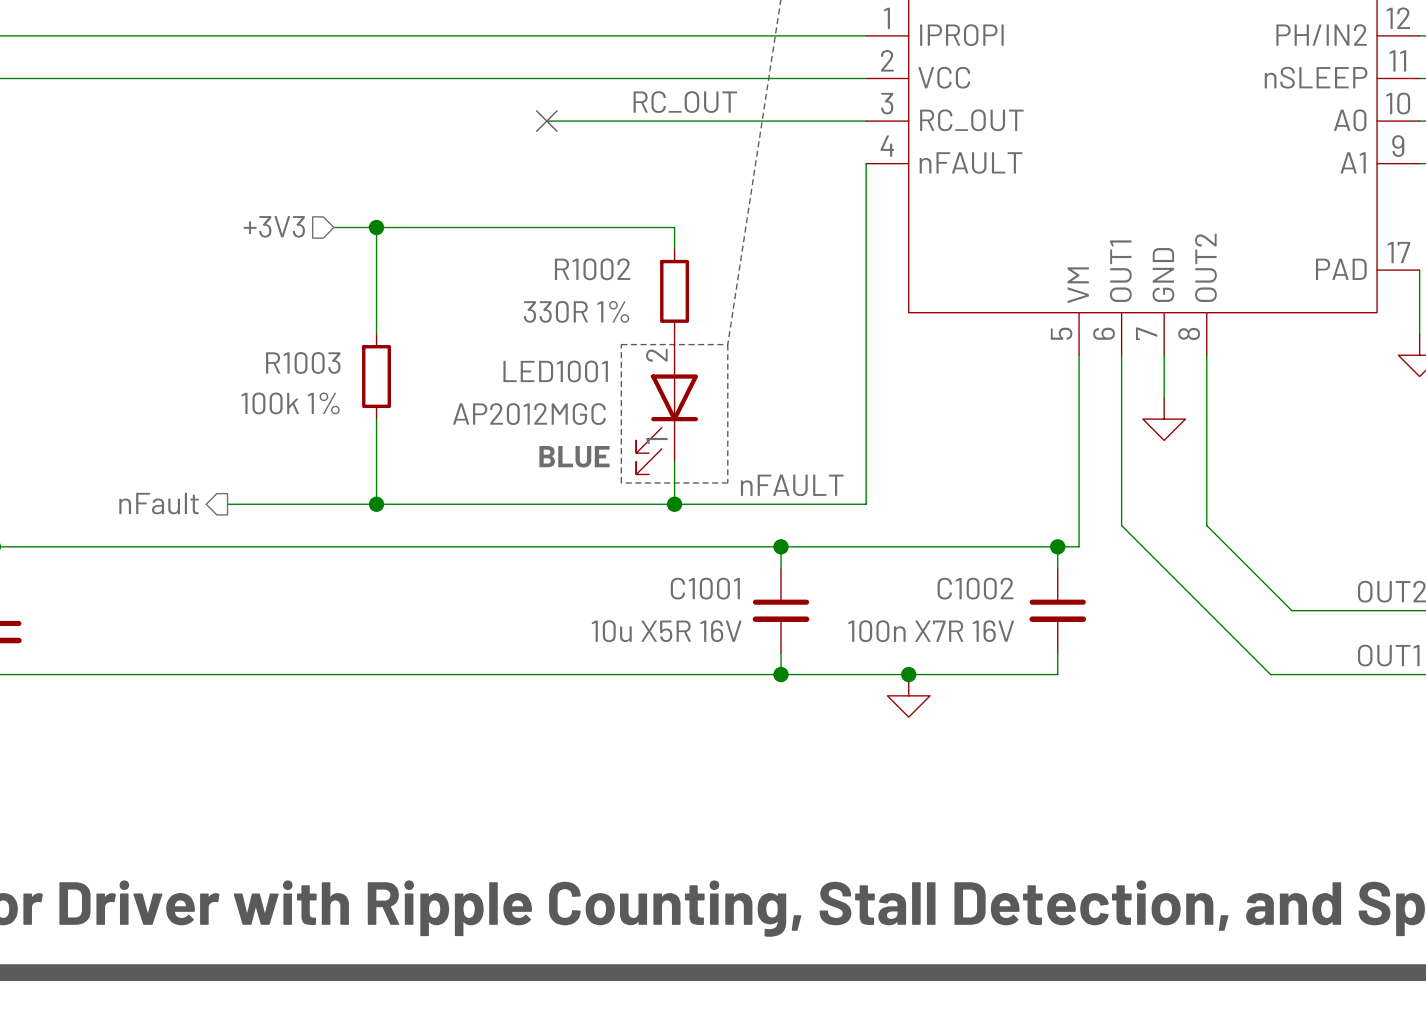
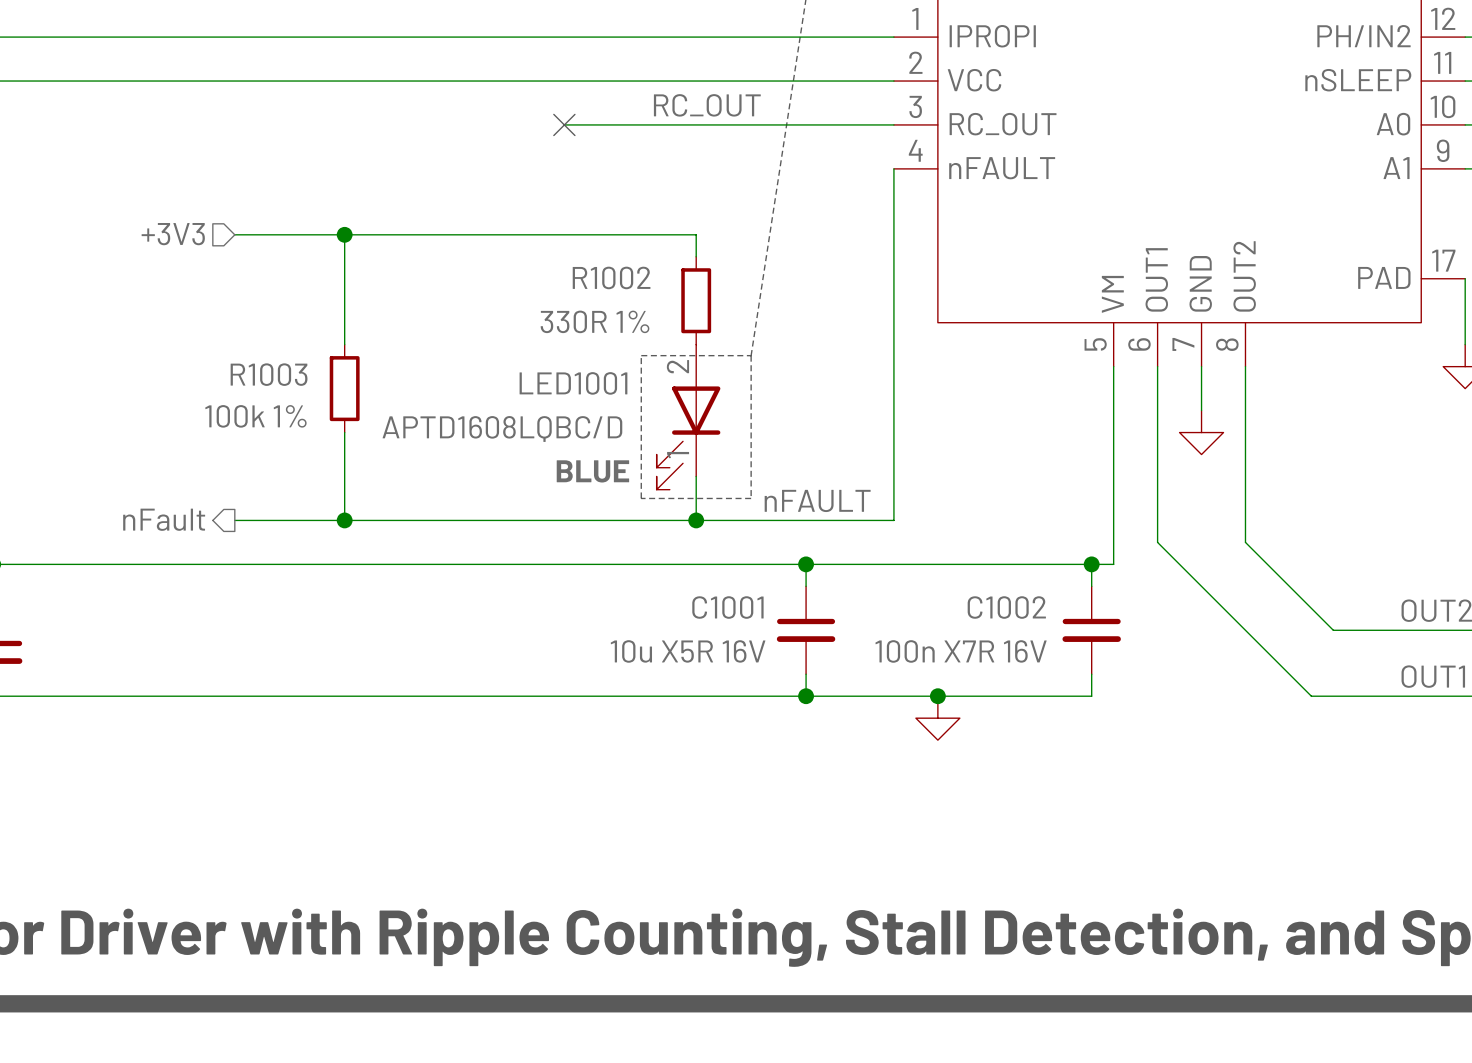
hierarchical label position: +3V3 (274, 226) -> +3V3 (173, 234)
wire: none -> (234, 234) (344, 234) (344, 344)
wire: (376, 227) (376, 333) -> none
junction position: (376, 227) -> (344, 234)
R1003 position: (376, 376) -> (344, 388)
LED1001 text: AP2012MGC (529, 414) -> APTD1608LQBC/D (502, 428)
wire: (376, 419) (376, 504) -> (344, 432) (344, 520)
junction position: (376, 504) -> (344, 520)

